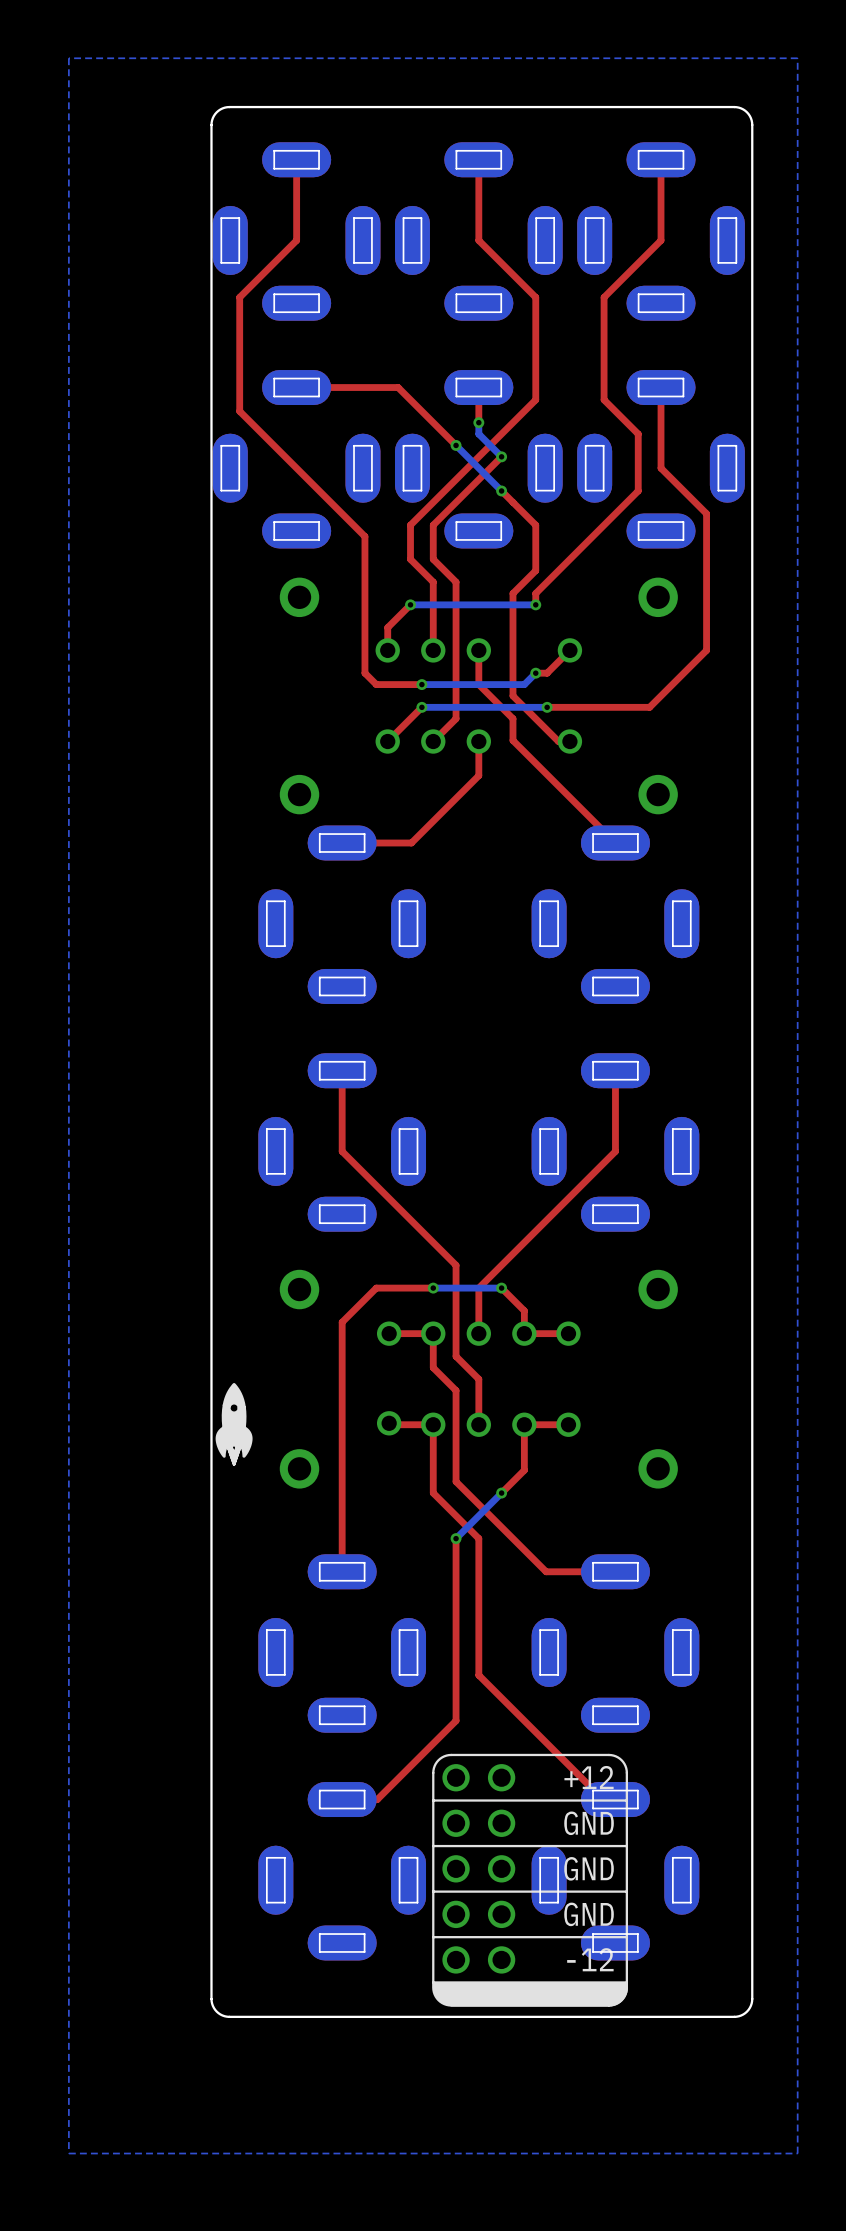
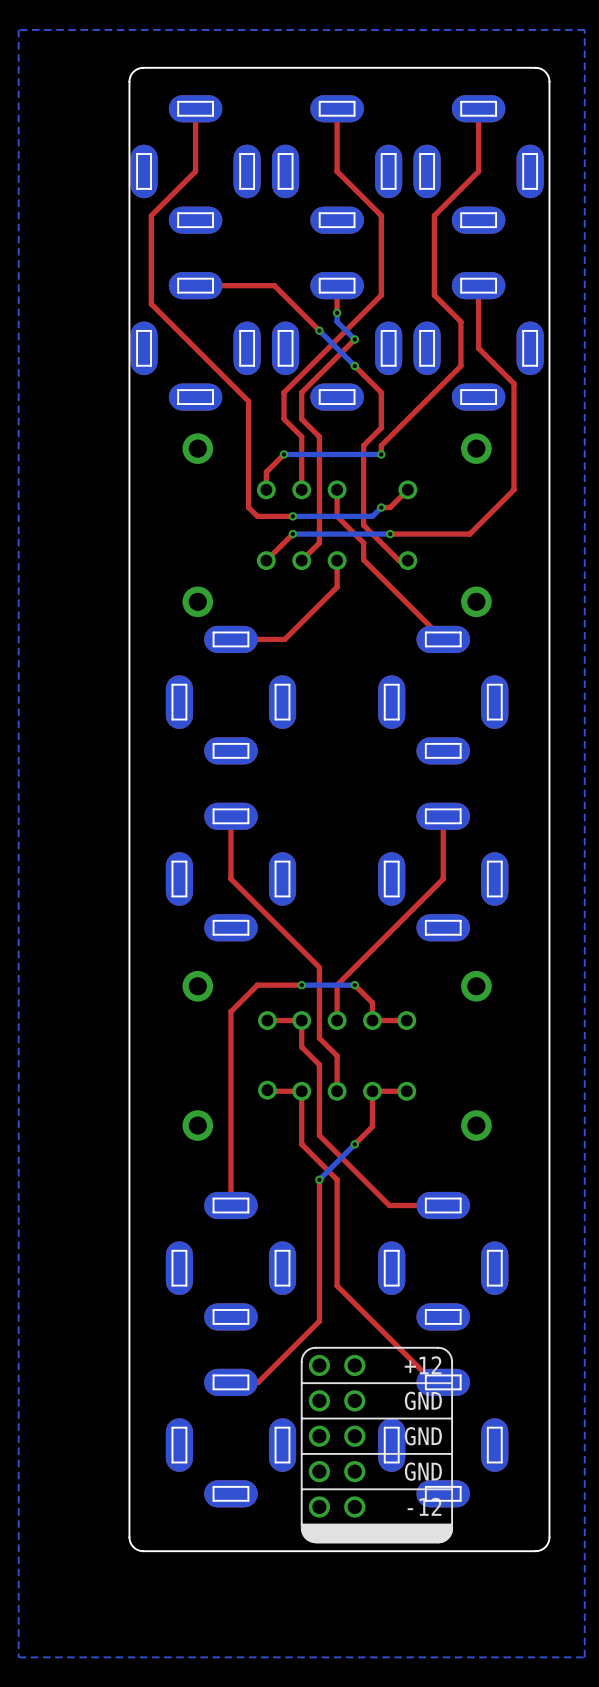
drawing: [215, 1383, 253, 1467] -> none

